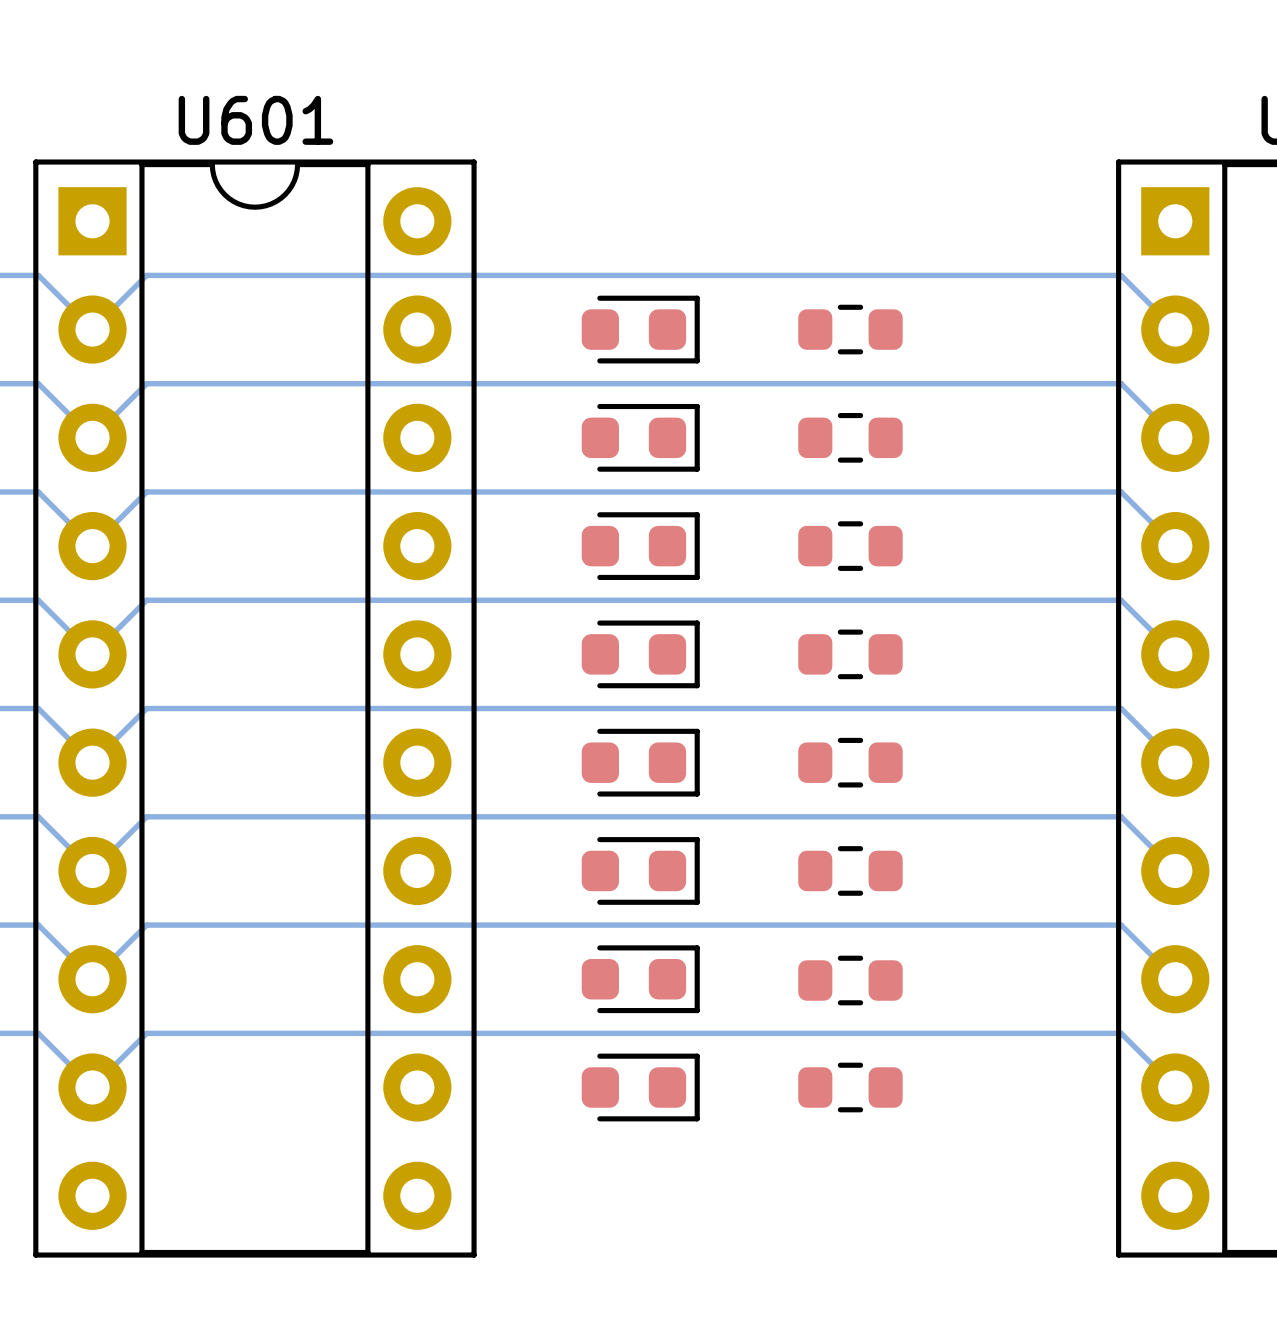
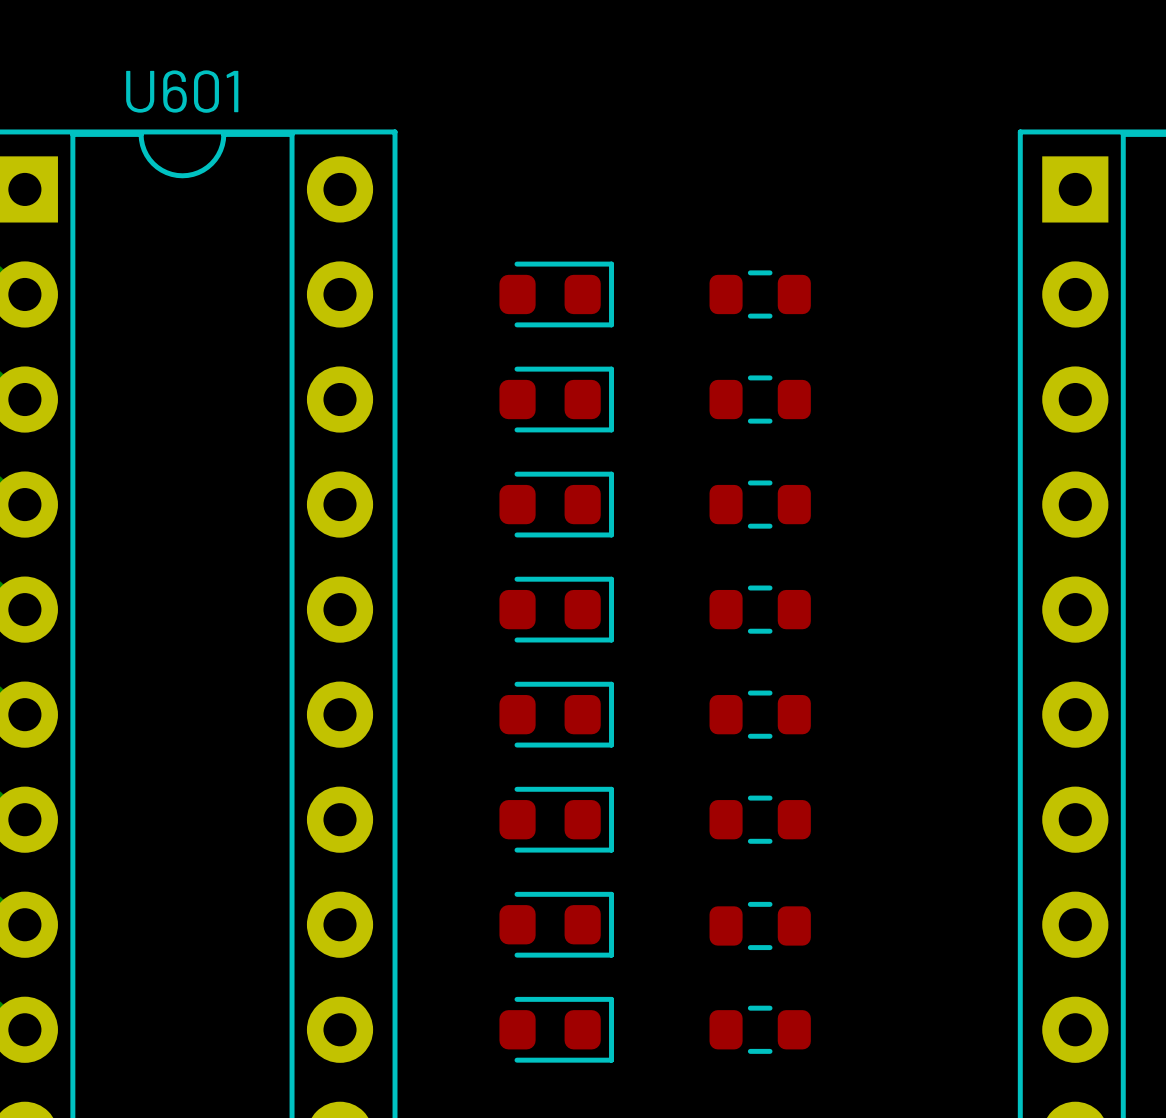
bottom track: (92, 329) (146, 275) (1121, 275) (1175, 329) -> none
bottom track: (92, 437) (146, 383) (1121, 383) (1175, 437) -> none
bottom track: (92, 546) (146, 491) (1121, 491) (1175, 546) -> none
bottom track: (92, 654) (146, 600) (1121, 600) (1175, 654) -> none
bottom track: (92, 762) (146, 708) (1121, 708) (1175, 762) -> none
bottom track: (92, 870) (146, 816) (1121, 816) (1175, 870) -> none
bottom track: (92, 979) (146, 925) (1121, 925) (1175, 979) -> none
bottom track: (92, 1087) (146, 1033) (1121, 1033) (1175, 1087) -> none

